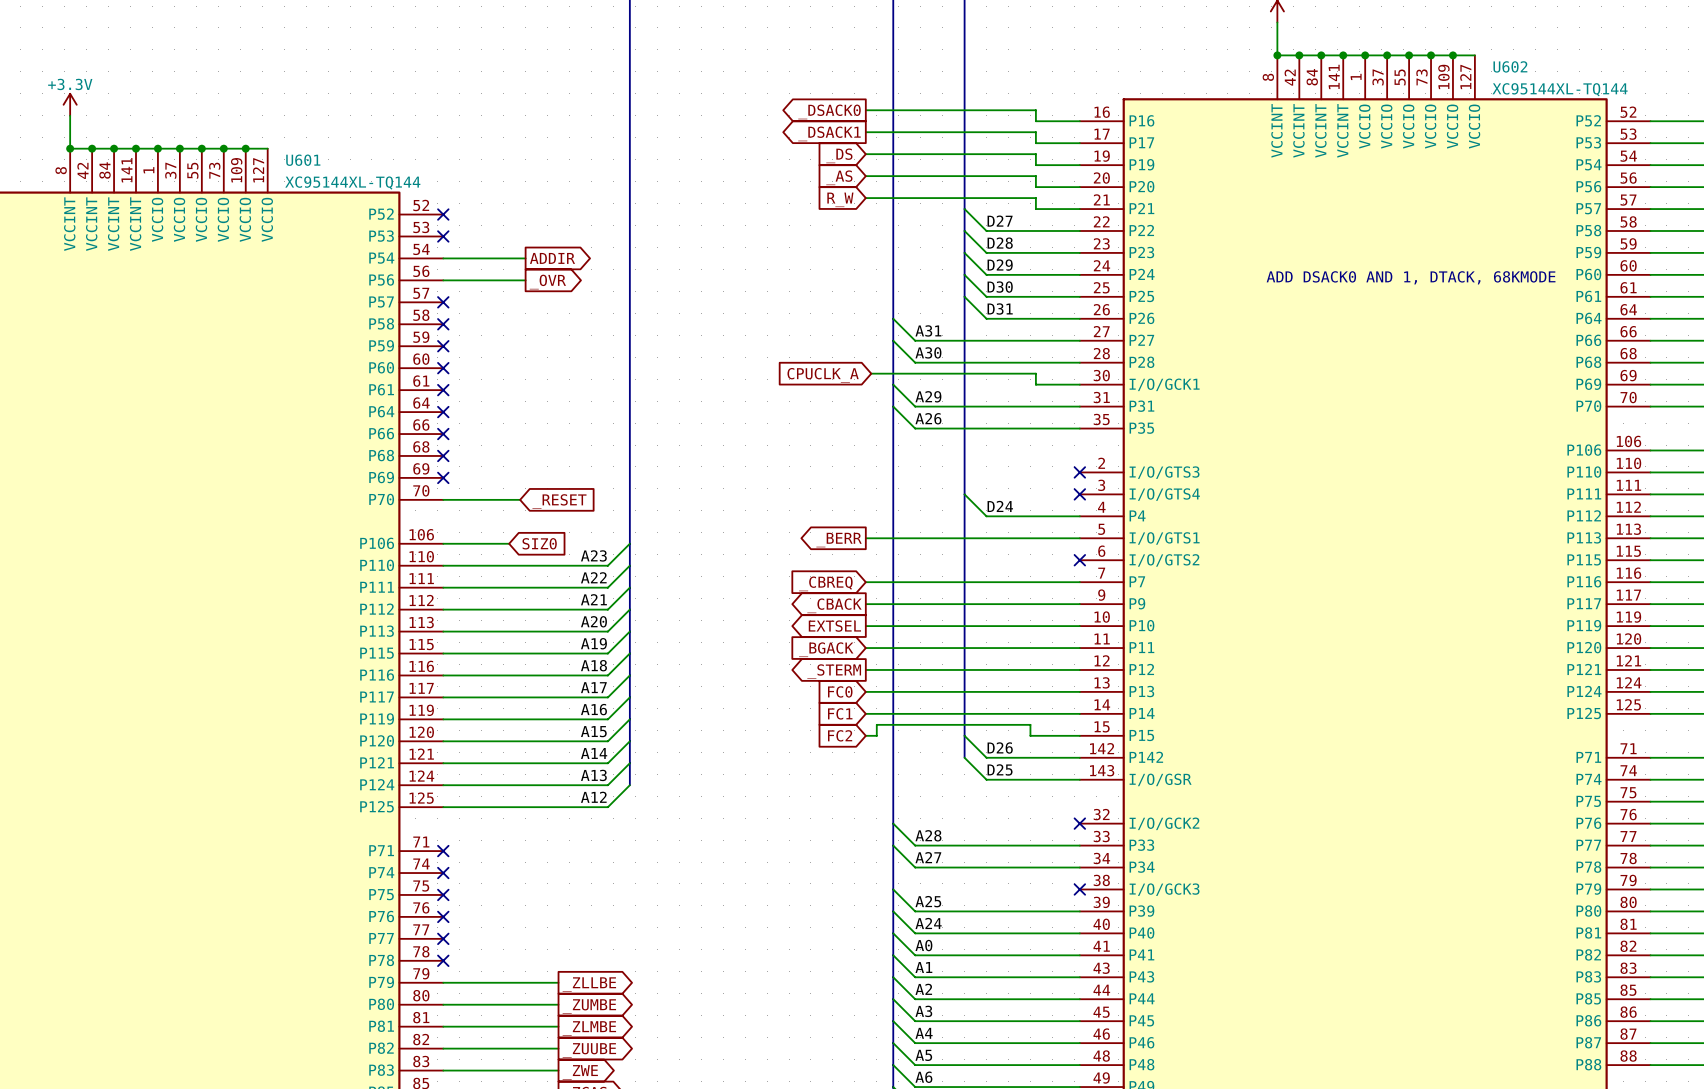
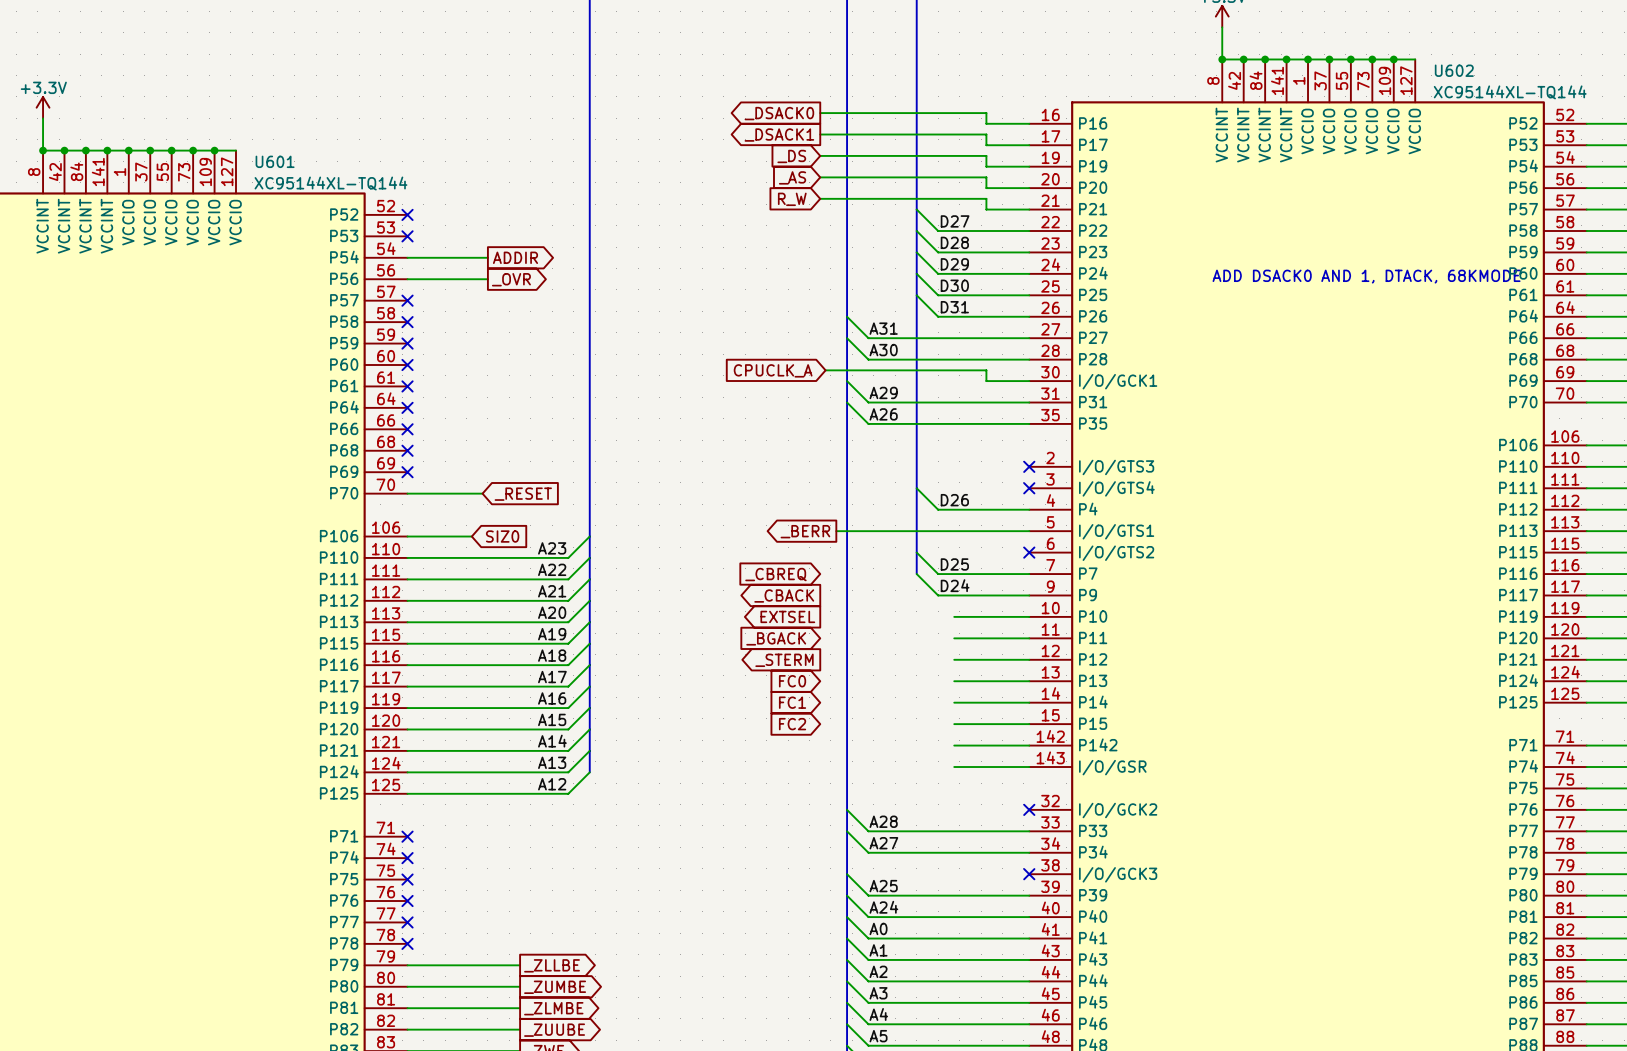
label: D24 (1000, 506) -> D26 (954, 500)
wire: (865, 538) (882, 538) -> none
global label position: _BERR (839, 540) -> _BERR (805, 531)
wire: (865, 582) (986, 582) -> (916, 552) (938, 574)
bus: (964, 582) (964, 757) -> none
label: none -> D24 (955, 585)
wire: (865, 604) (986, 604) -> (916, 574) (938, 595)
wire: (865, 626) (1003, 626) -> none
wire: (865, 648) (1003, 648) -> none
wire: (865, 669) (1003, 669) -> none
wire: (865, 691) (1003, 691) -> none
wire: (865, 713) (1003, 713) -> none
wire: (865, 735) (876, 735) (876, 724) (1030, 724) (1030, 735) -> (954, 724) (981, 724)
wire: (964, 735) (986, 757) (1003, 757) -> none
label: D26 (1000, 747) -> none
wire: (964, 757) (986, 779) (1003, 779) -> none
label position: D25 (1000, 769) -> D25 (954, 564)

